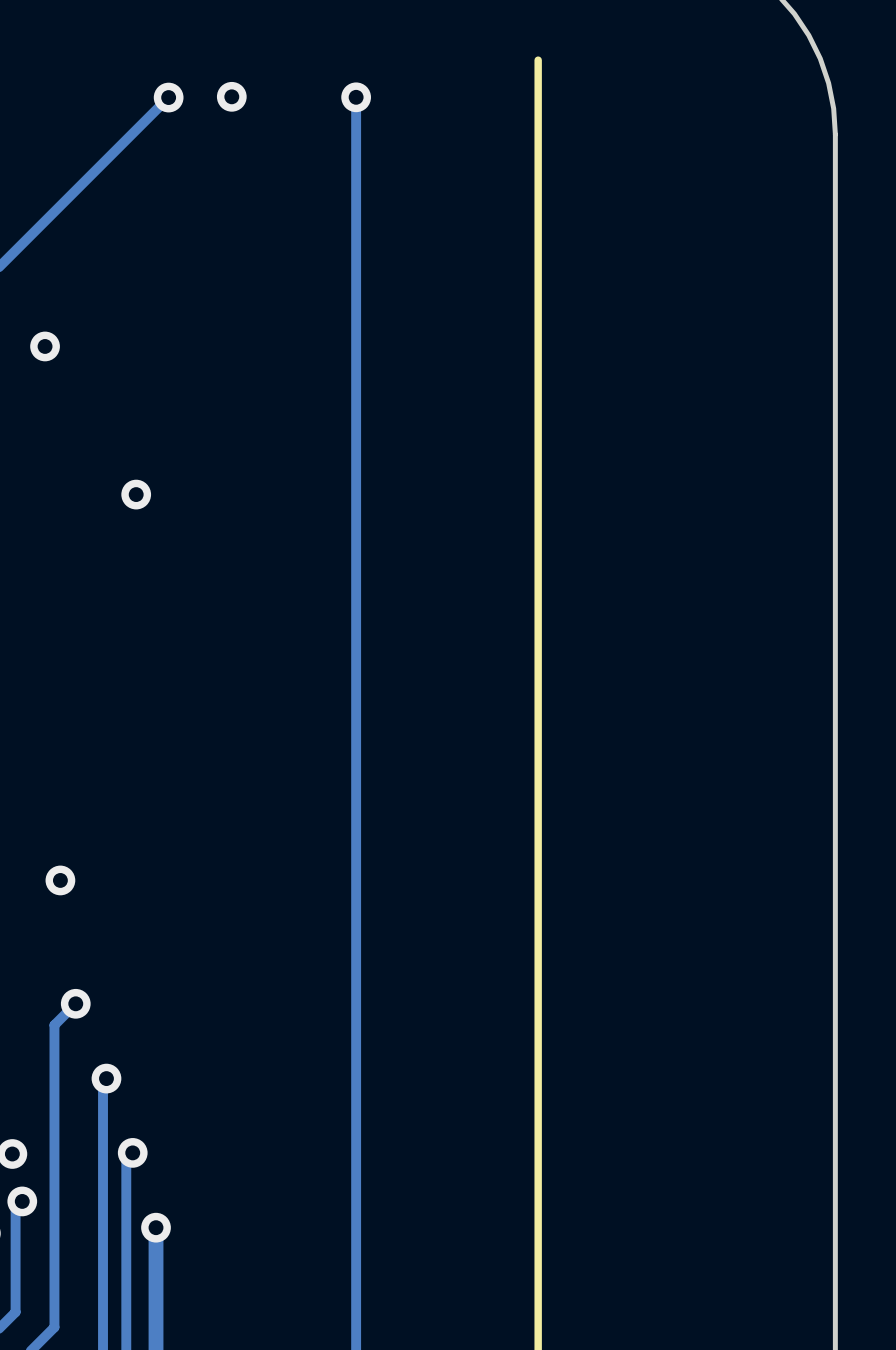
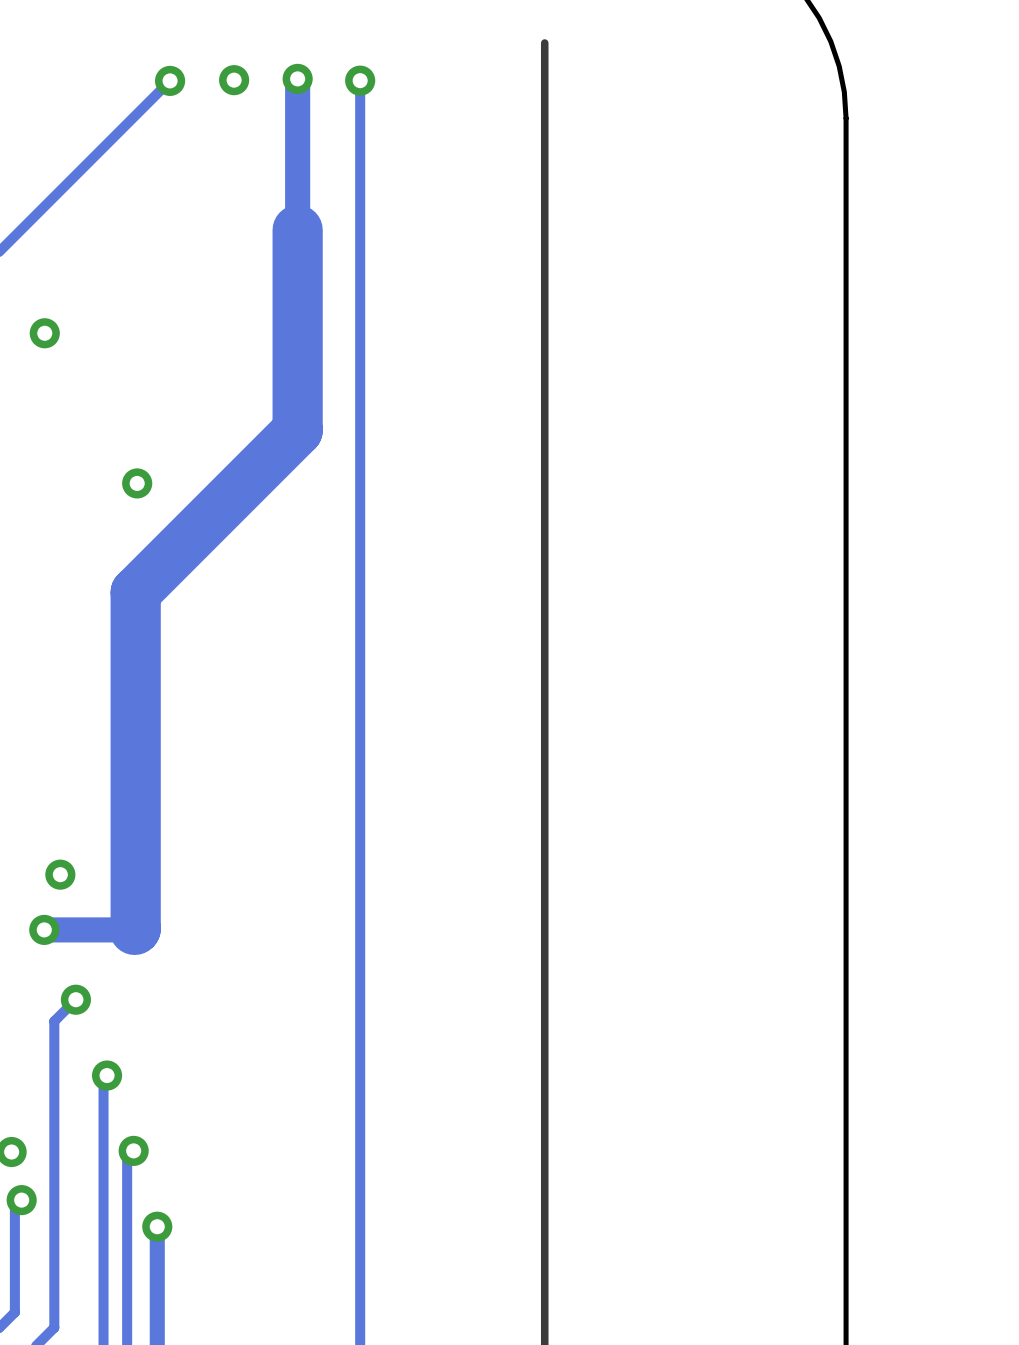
track: none -> (297, 78) (297, 430) (135, 592) (135, 928) (44, 929)
via: none -> (297, 78)
via: none -> (44, 929)

